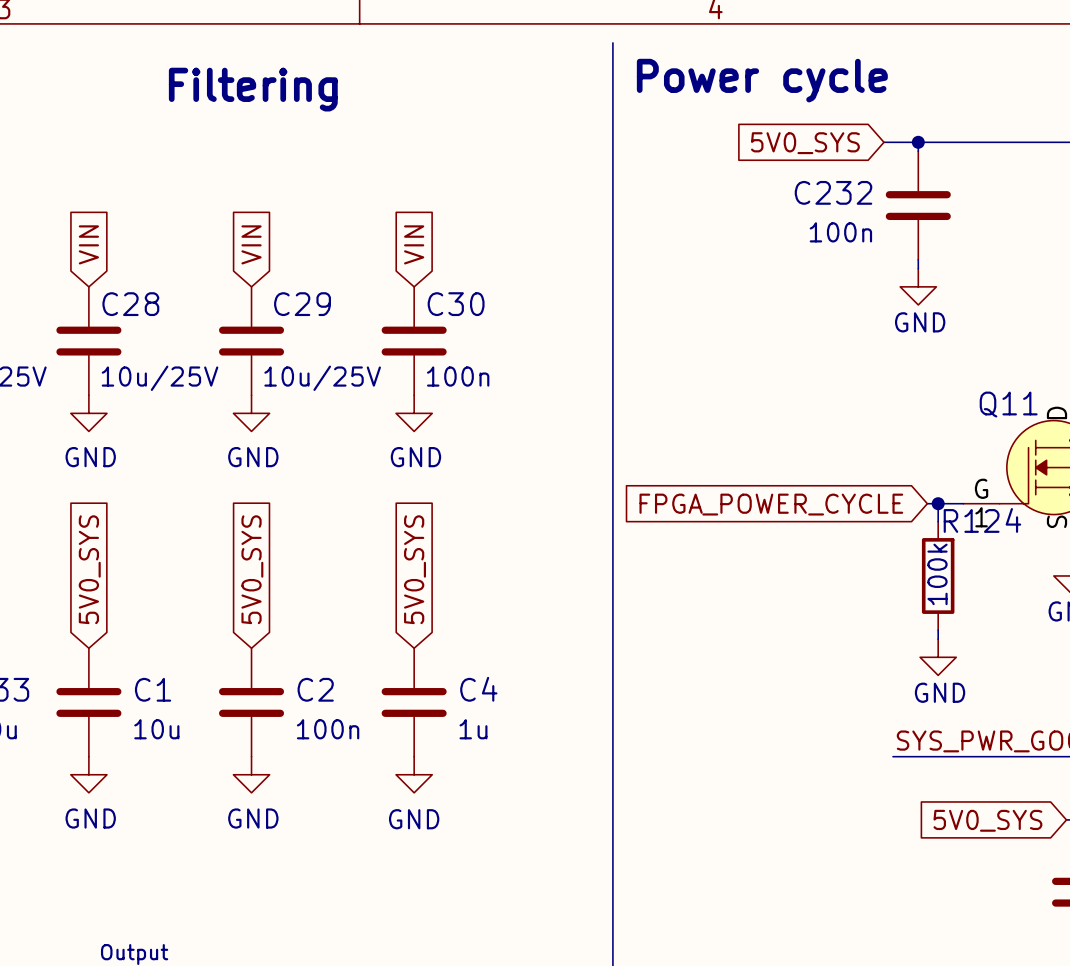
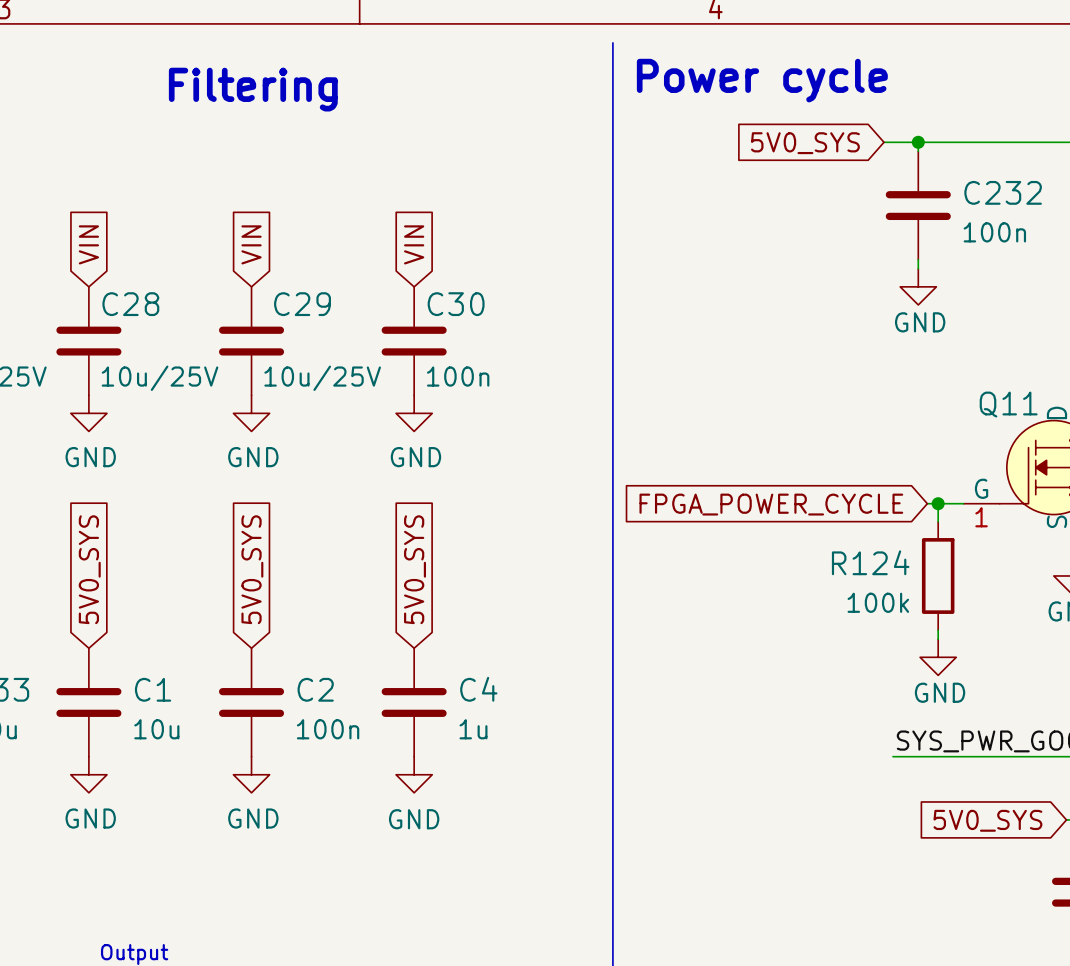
C232 name position: C232 (833, 192) -> C232 (1003, 192)
C232 text position: 100n (840, 232) -> 100n (994, 232)
R124 name position: R124 (982, 520) -> R124 (870, 562)
R124 text rotation: 0° (937, 574) -> 90° clockwise (878, 602)

